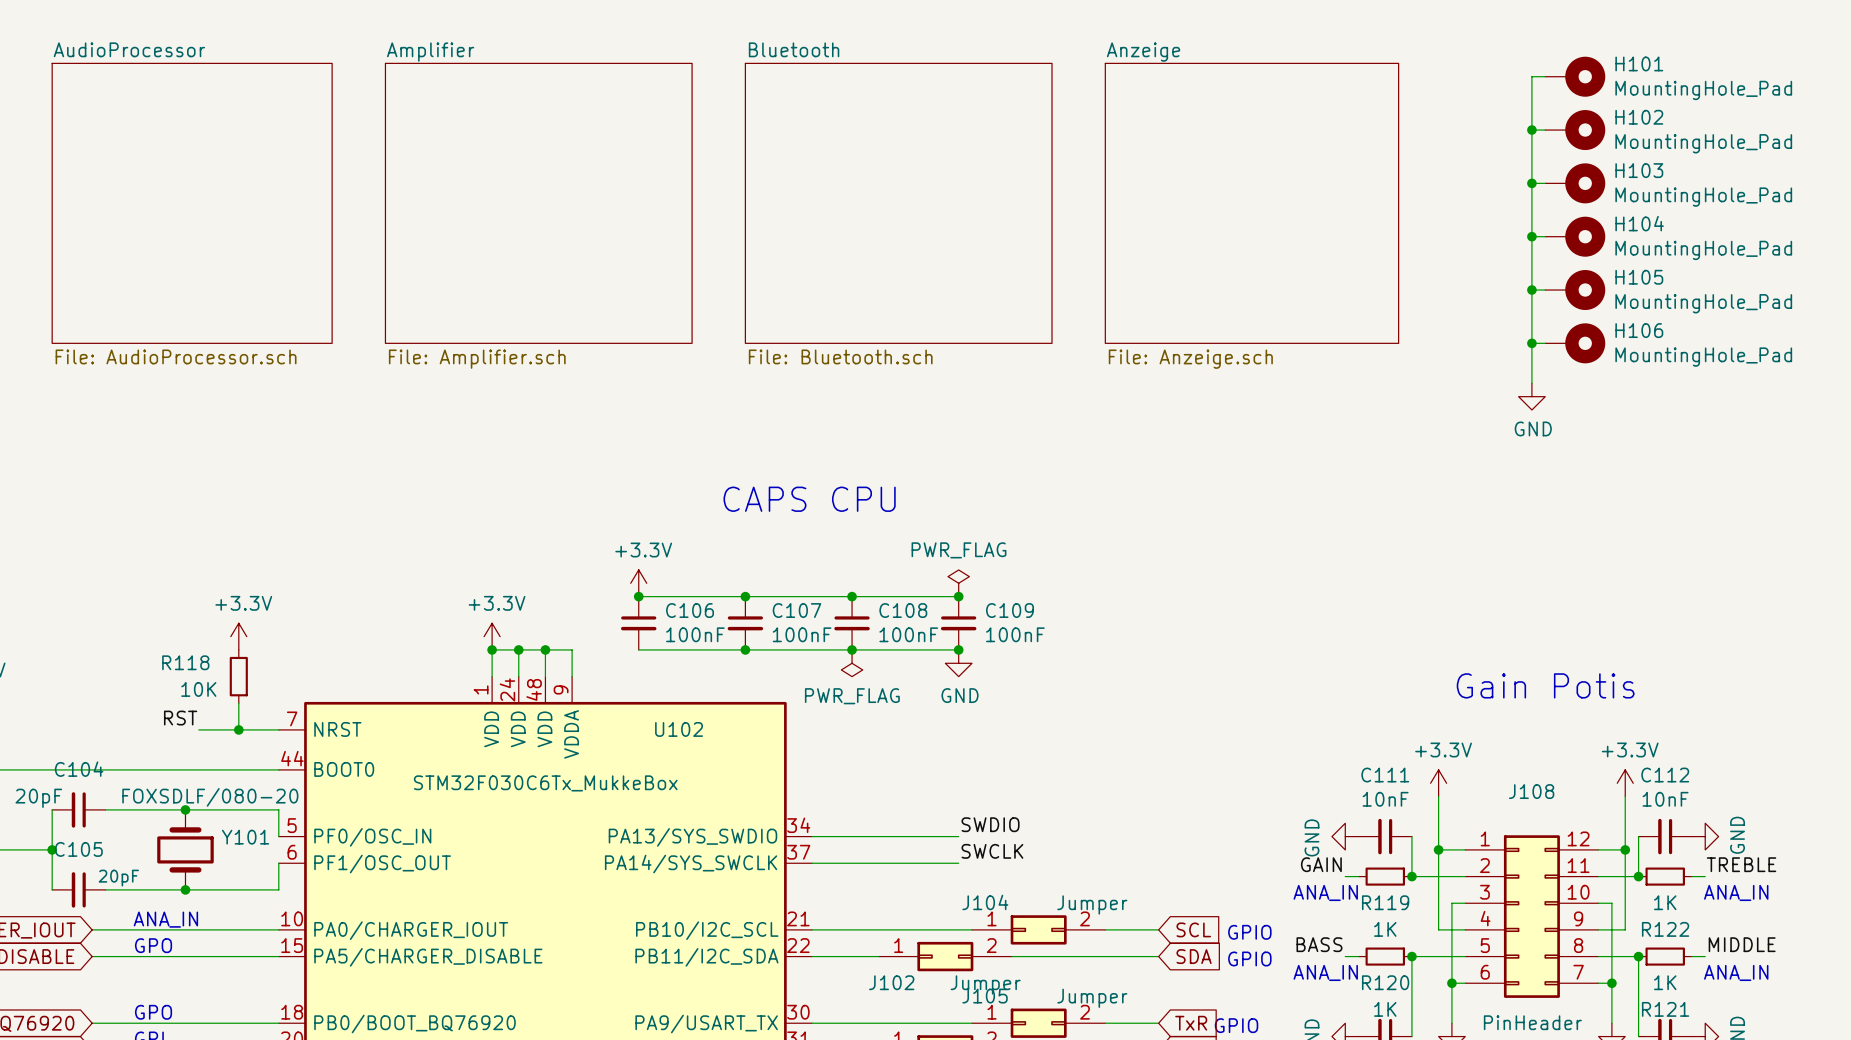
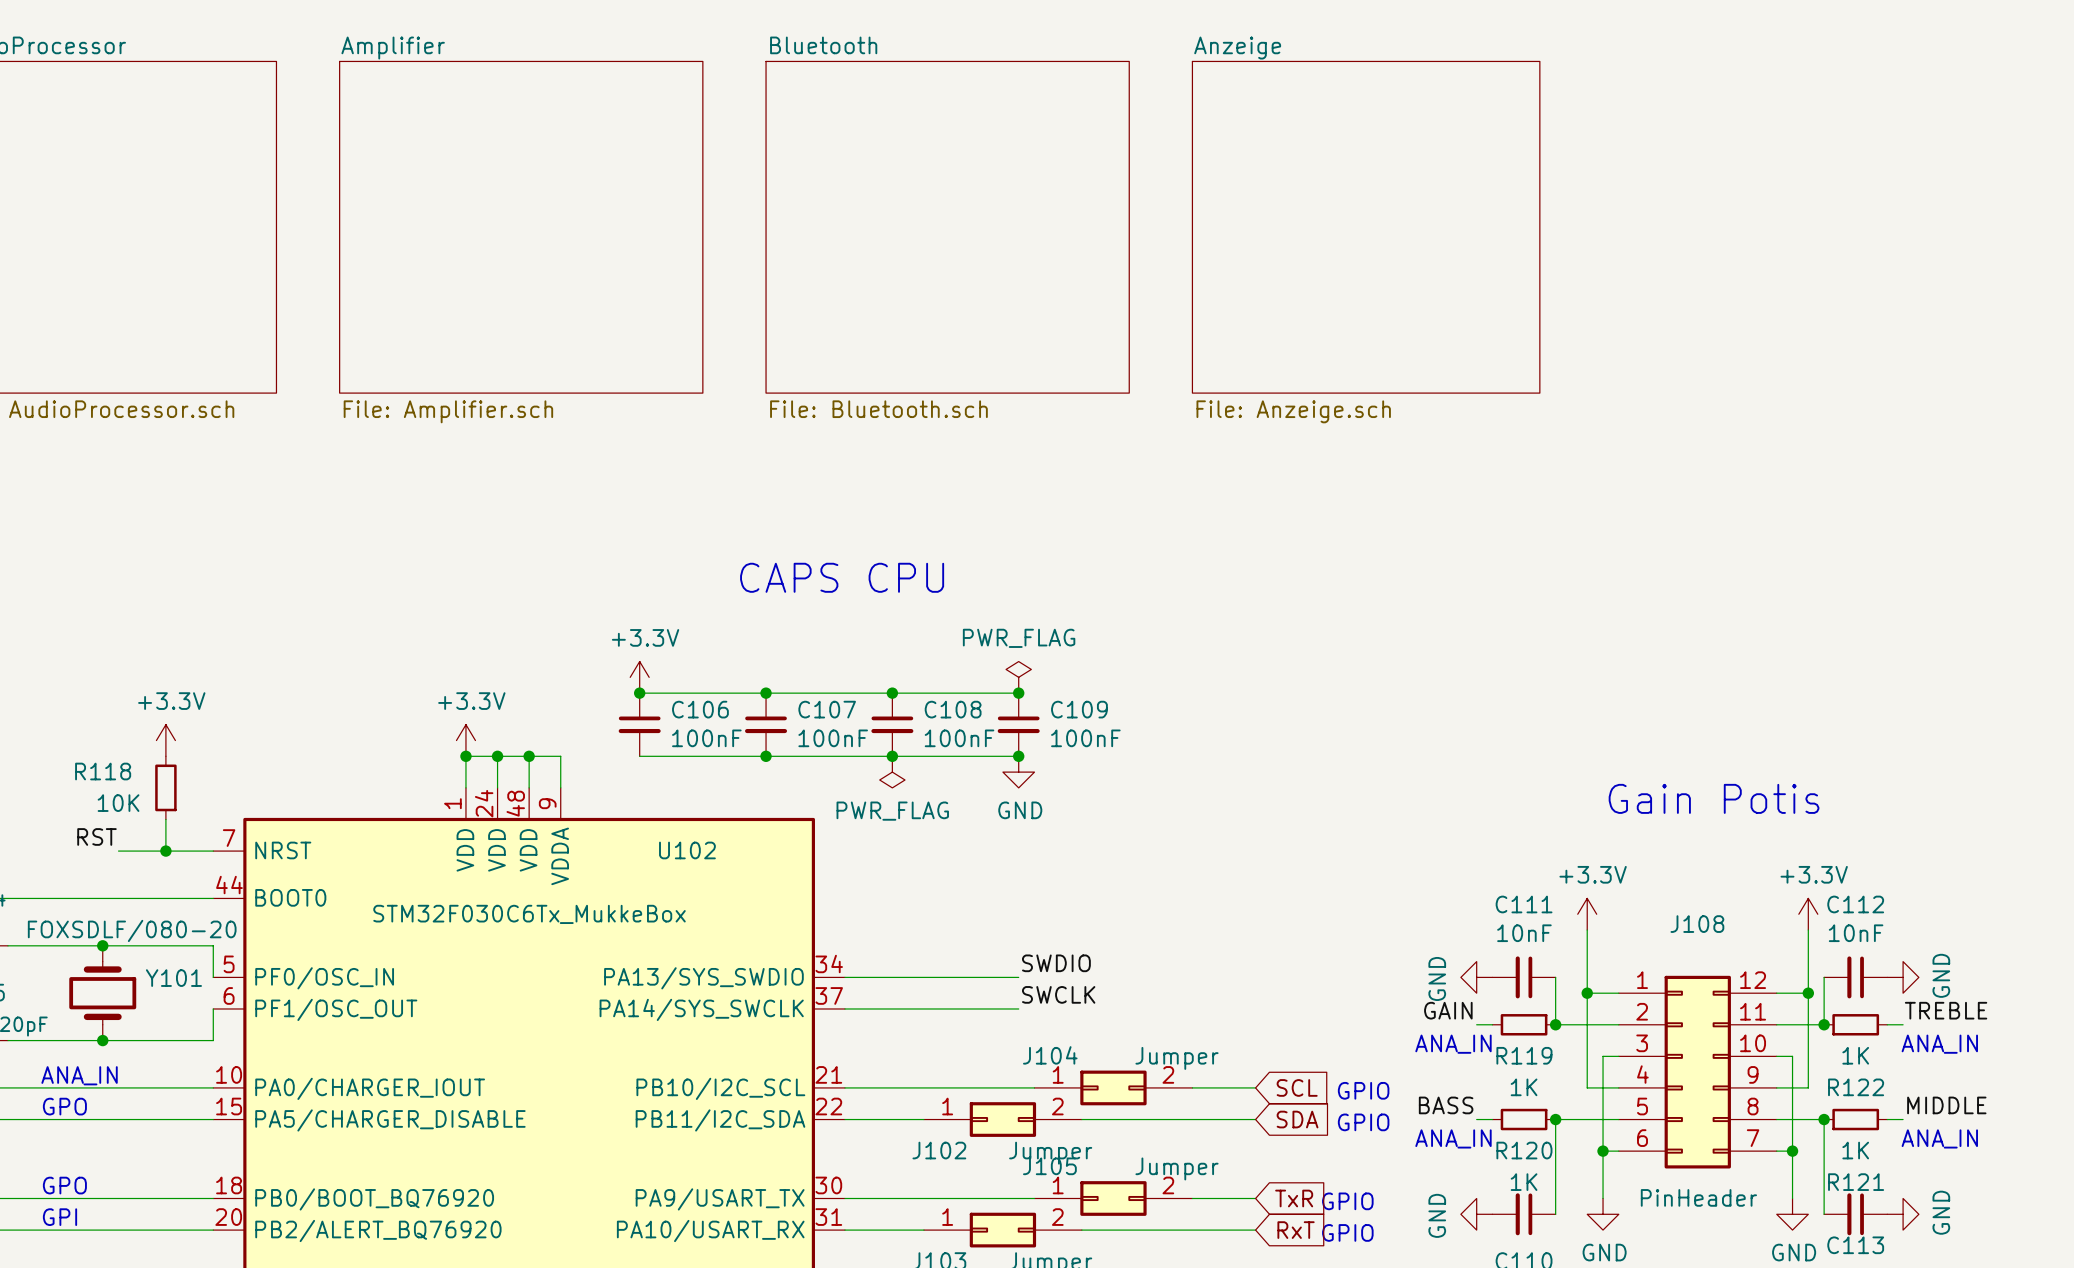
wire: (1545, 76) (1531, 76) (1531, 383) -> none
H101: MountingHole_Pad (1575, 76) -> none
wire: (1531, 130) (1545, 130) -> none
junction: (1531, 130) -> none
H102: MountingHole_Pad (1575, 130) -> none
wire: (1531, 183) (1545, 183) -> none
junction: (1531, 183) -> none
H103: MountingHole_Pad (1575, 183) -> none
wire: (1531, 236) (1545, 236) -> none
junction: (1531, 236) -> none
H104: MountingHole_Pad (1575, 236) -> none
wire: (1531, 290) (1545, 290) -> none
junction: (1531, 290) -> none
H105: MountingHole_Pad (1575, 290) -> none
wire: (1531, 343) (1545, 343) -> none
junction: (1531, 343) -> none
H106: MountingHole_Pad (1575, 343) -> none
power symbol: GND (1531, 396) -> none

